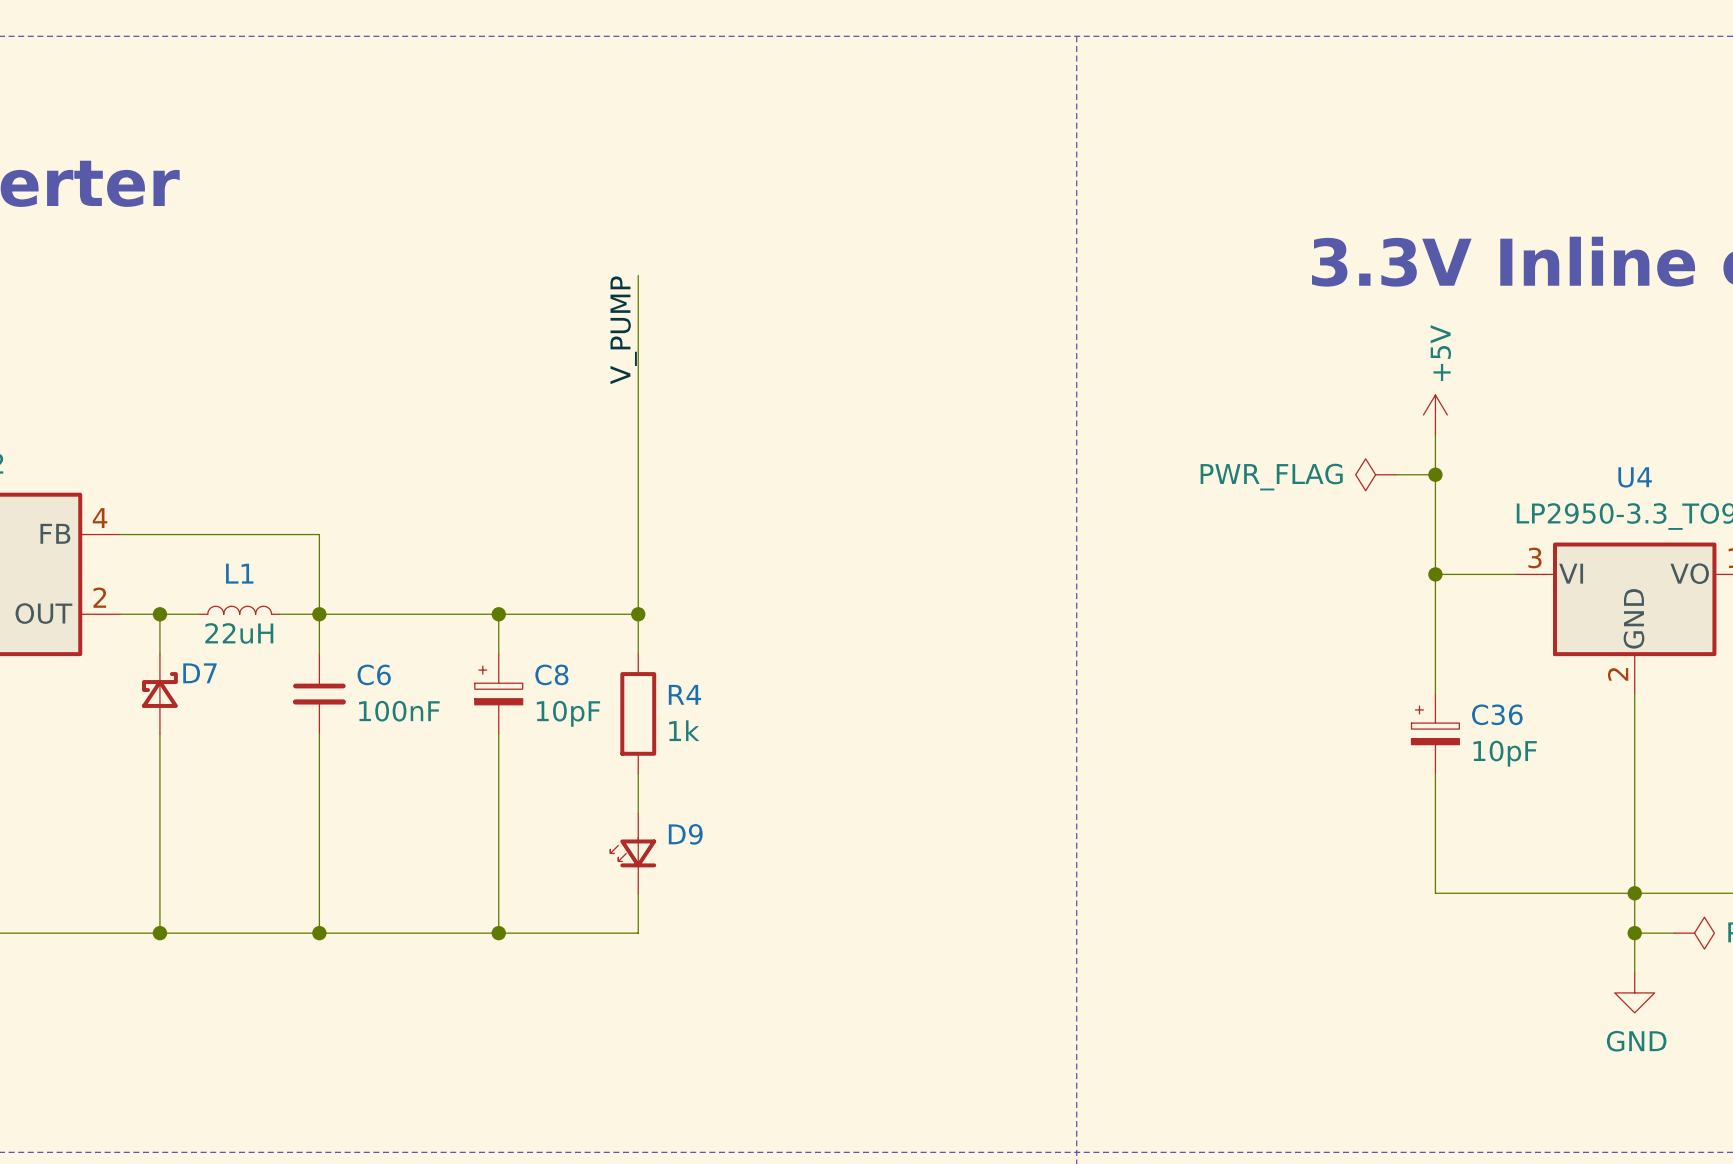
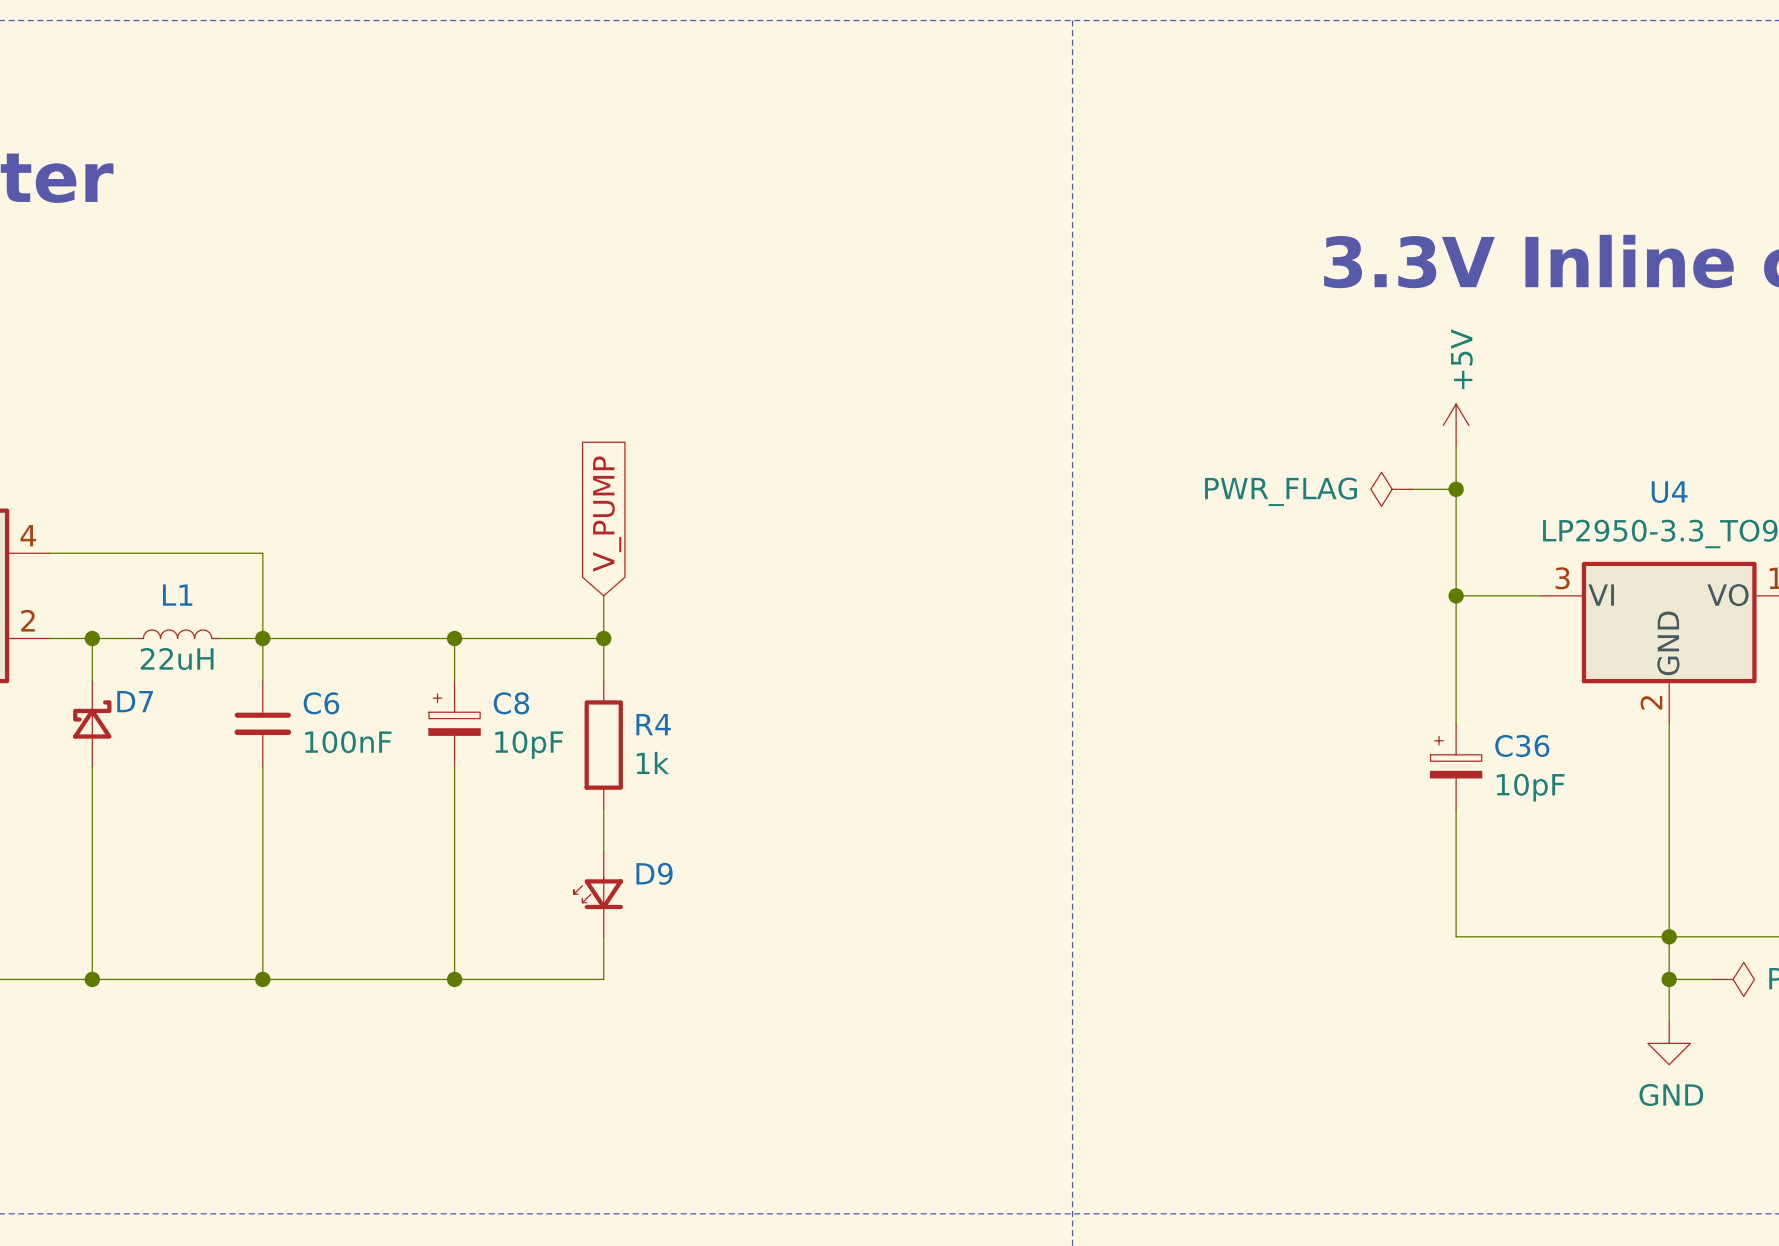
wire: (638, 275) (638, 574) -> none
label: V_PUMP (623, 330) -> none
global label: none -> V_PUMP (607, 514)

